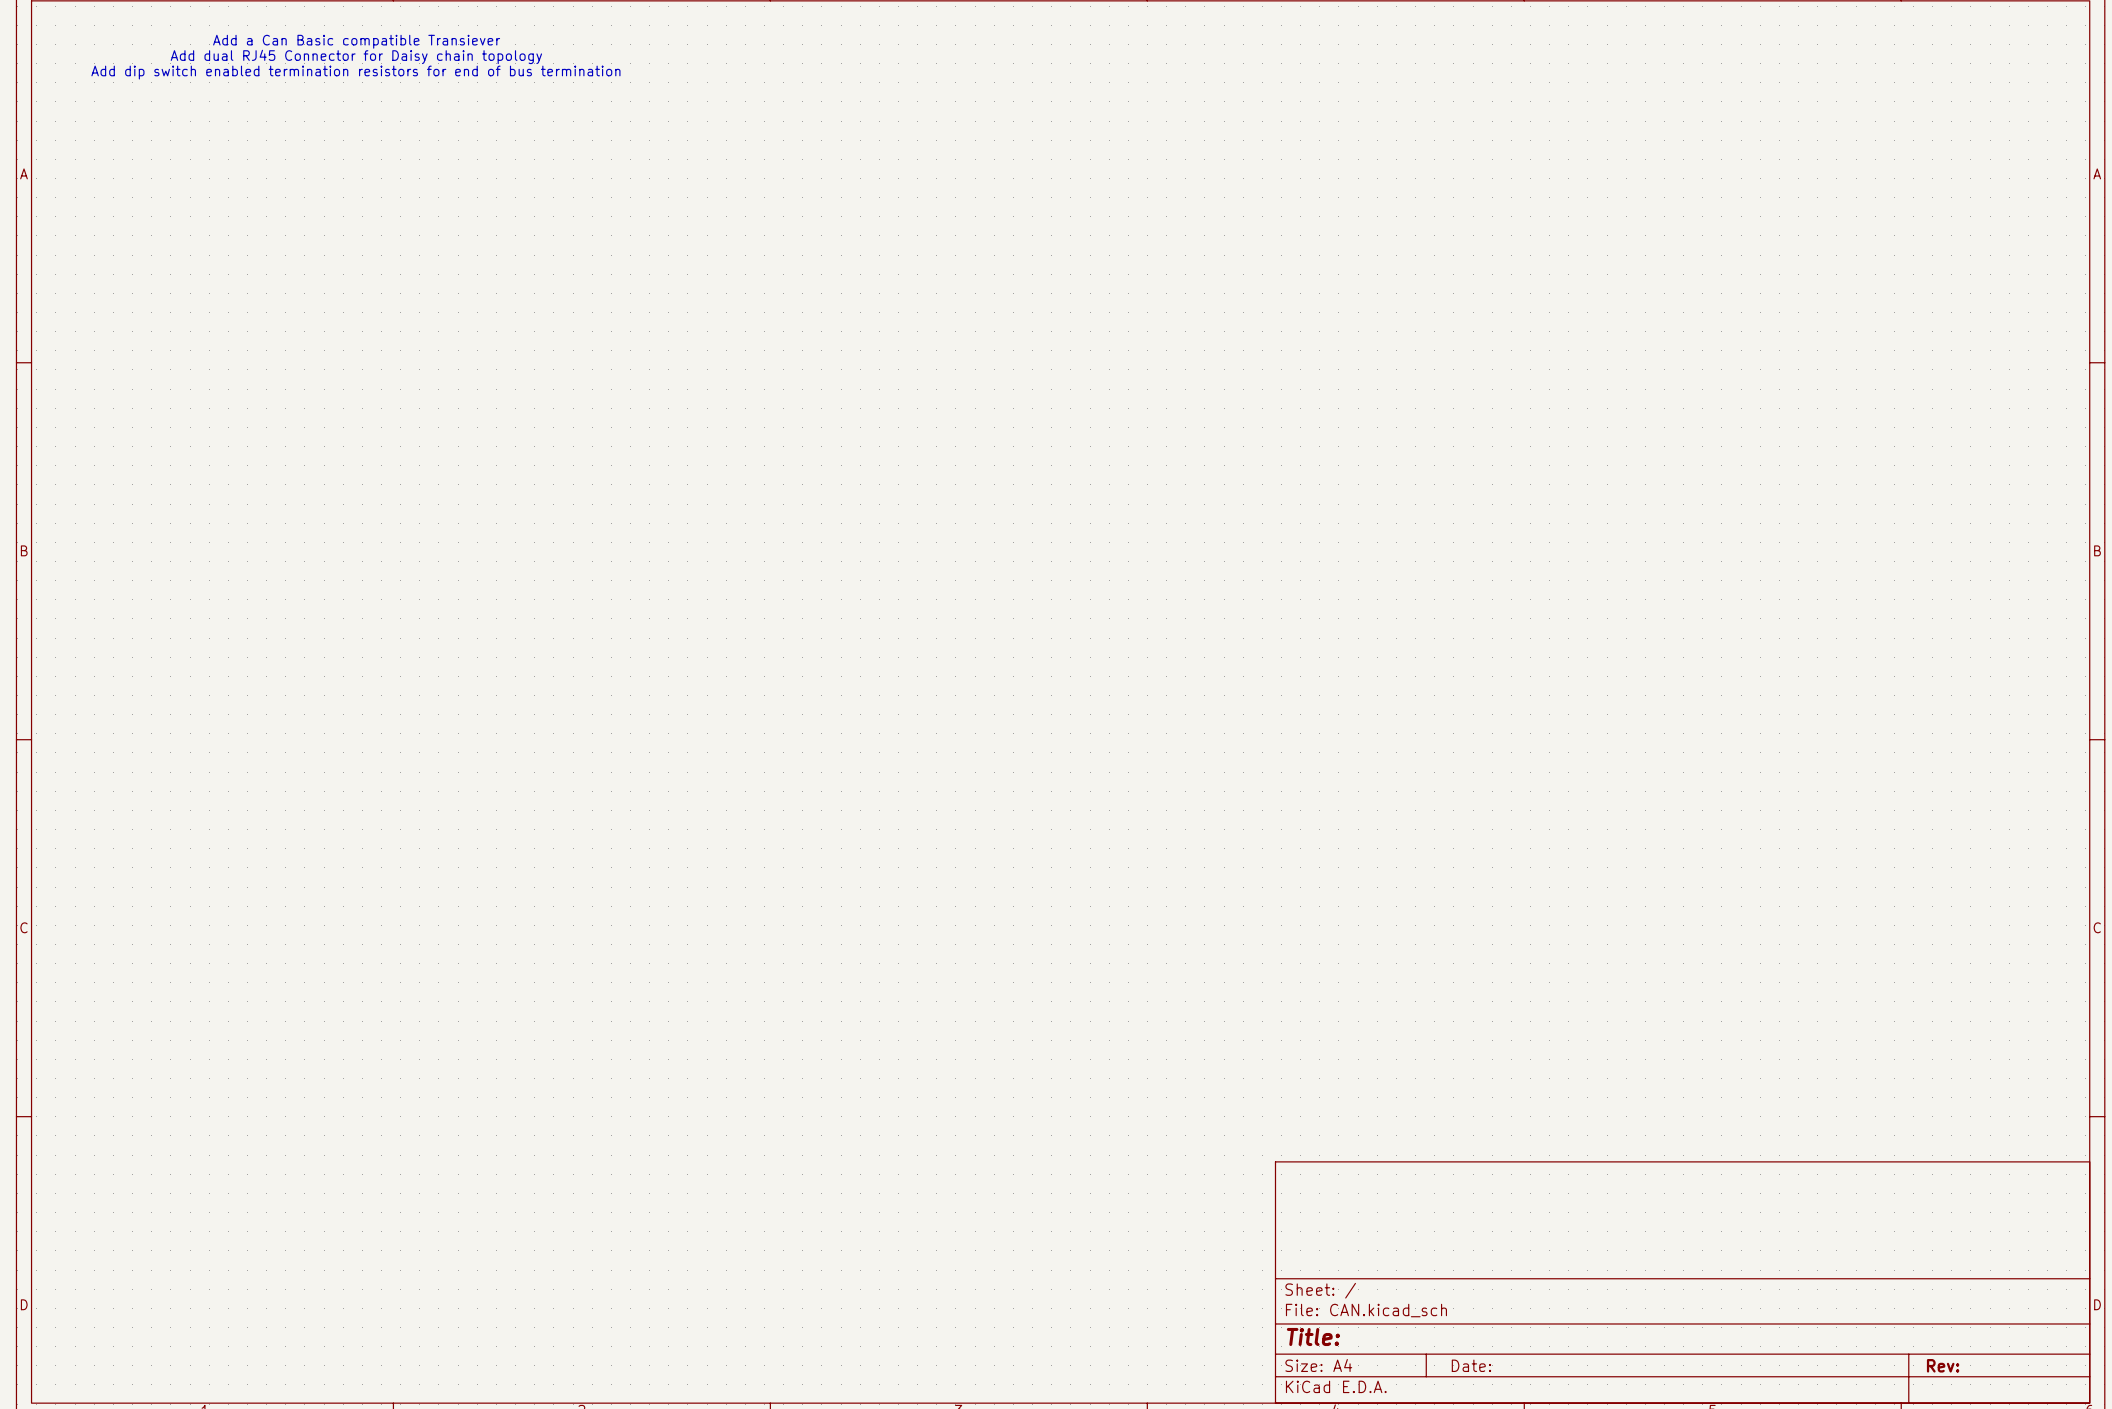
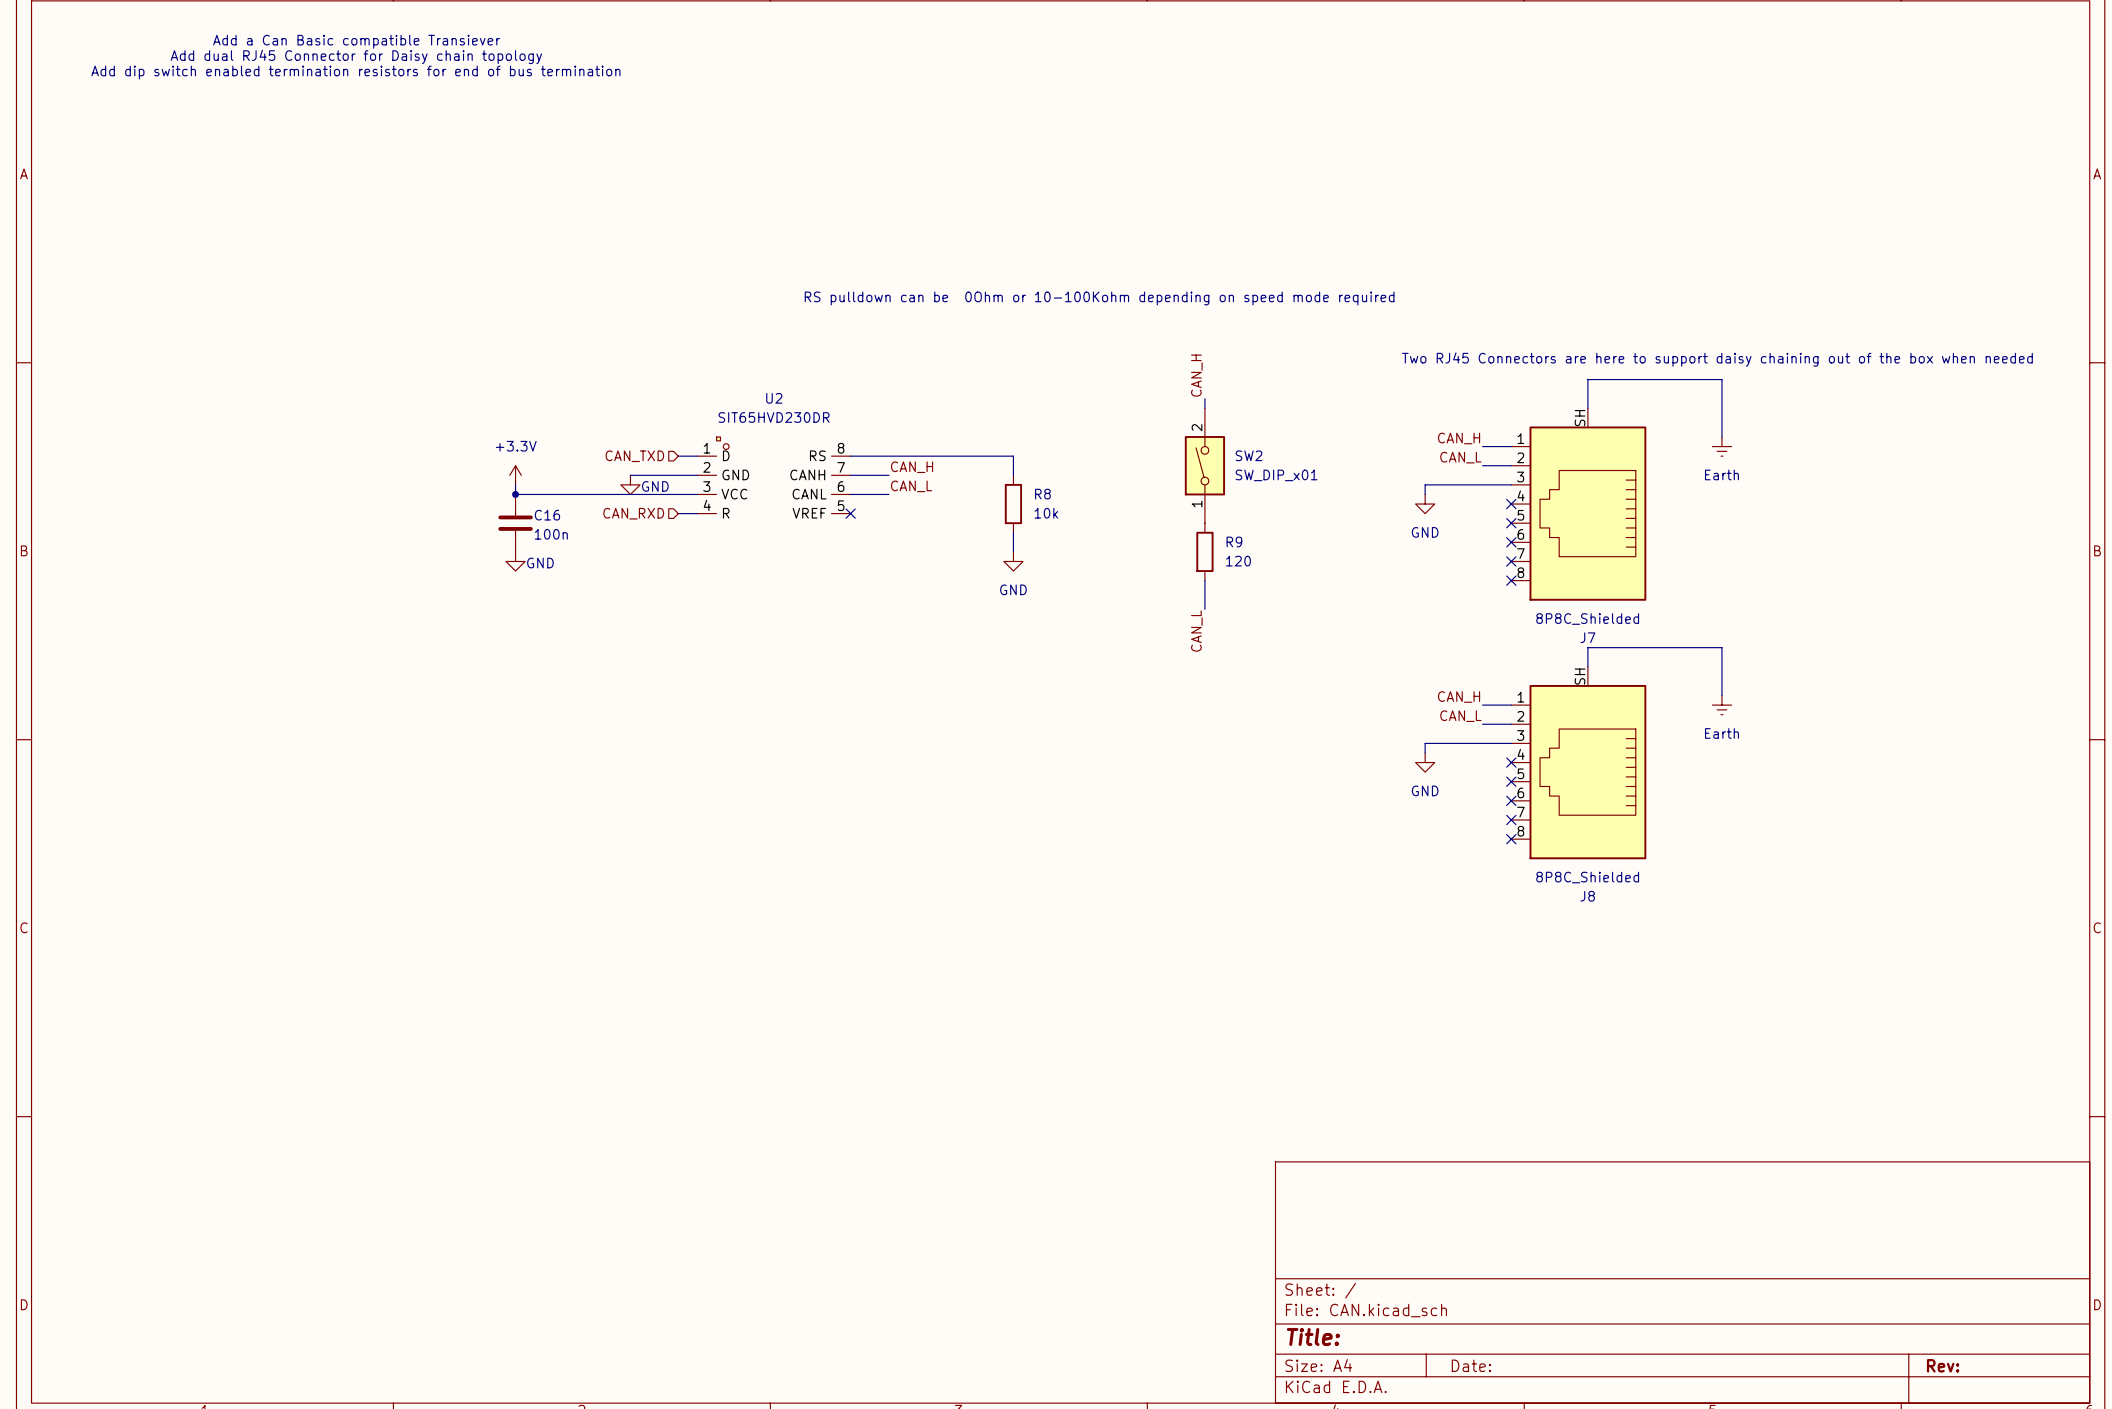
text: none -> RS pulldown can be 0Ohm or 10-100Kohm depending on speed mode required (1099, 298)
text: none -> Two RJ45 Connectors are here to support daisy chaining out of the box when needed (1717, 359)
label: none -> CAN_H (1196, 375)
wire: none -> (1204, 398) (1204, 408)
wire: none -> (1587, 408) (1587, 379) (1721, 379) (1721, 437)
label: none -> CAN_H (1459, 438)
wire: none -> (1482, 446) (1511, 446)
power symbol: none -> Earth (1721, 446)
hierarchical label: none -> CAN_TXD (634, 456)
wire: none -> (678, 456) (697, 456)
wire: none -> (850, 456) (1013, 456) (1013, 475)
label: none -> CAN_L (1460, 457)
SW2: none -> SW_DIP_x01 (1204, 465)
wire: none -> (1482, 465) (1511, 465)
label: none -> CAN_H (912, 467)
power symbol: none -> +3.3V (515, 475)
wire: none -> (630, 475) (697, 475)
U2: none -> SIT65HVD230DR (774, 475)
wire: none -> (850, 475) (888, 475)
wire: none -> (515, 484) (515, 494) (697, 494)
power symbol: none -> GND (630, 484)
wire: none -> (1511, 484) (1425, 484) (1425, 494)
label: none -> CAN_L (911, 486)
junction: none -> (515, 494)
wire: none -> (850, 494) (888, 494)
R8: none -> 10k (1013, 504)
power symbol: none -> GND (1425, 504)
no-connect mark: none -> (1511, 504)
J7: none -> 8P8C_Shielded (1578, 504)
hierarchical label: none -> CAN_RXD (633, 513)
wire: none -> (678, 513) (697, 513)
no-connect mark: none -> (850, 513)
C16: none -> 100n (515, 523)
no-connect mark: none -> (1511, 523)
wire: none -> (1013, 532) (1013, 551)
no-connect mark: none -> (1511, 542)
R9: none -> 120 (1204, 551)
power symbol: none -> GND (515, 561)
power symbol: none -> GND (1013, 561)
no-connect mark: none -> (1511, 561)
wire: none -> (1204, 580) (1204, 609)
no-connect mark: none -> (1511, 580)
label: none -> CAN_L (1196, 631)
wire: none -> (1587, 666) (1587, 647) (1721, 647) (1721, 695)
label: none -> CAN_H (1459, 697)
wire: none -> (1482, 705) (1511, 705)
power symbol: none -> Earth (1721, 705)
label: none -> CAN_L (1460, 716)
wire: none -> (1482, 724) (1511, 724)
wire: none -> (1511, 743) (1425, 743) (1425, 752)
power symbol: none -> GND (1425, 762)
no-connect mark: none -> (1511, 762)
J8: none -> 8P8C_Shielded (1578, 763)
no-connect mark: none -> (1511, 781)
no-connect mark: none -> (1511, 800)
no-connect mark: none -> (1511, 819)
no-connect mark: none -> (1511, 839)

